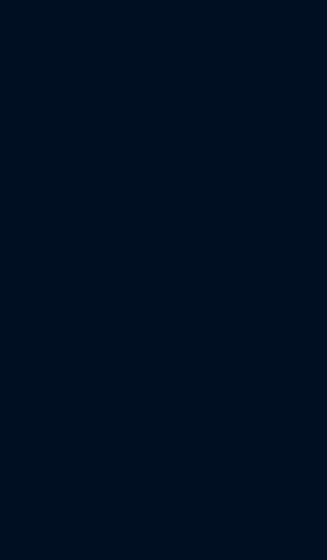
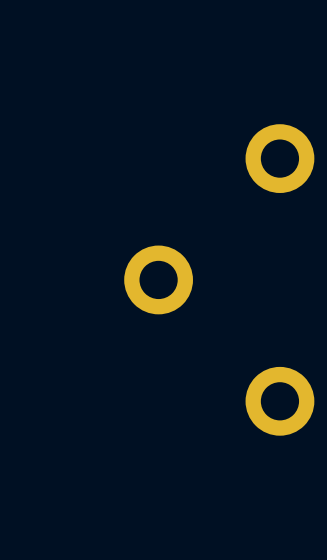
part: none -> (219, 279)

